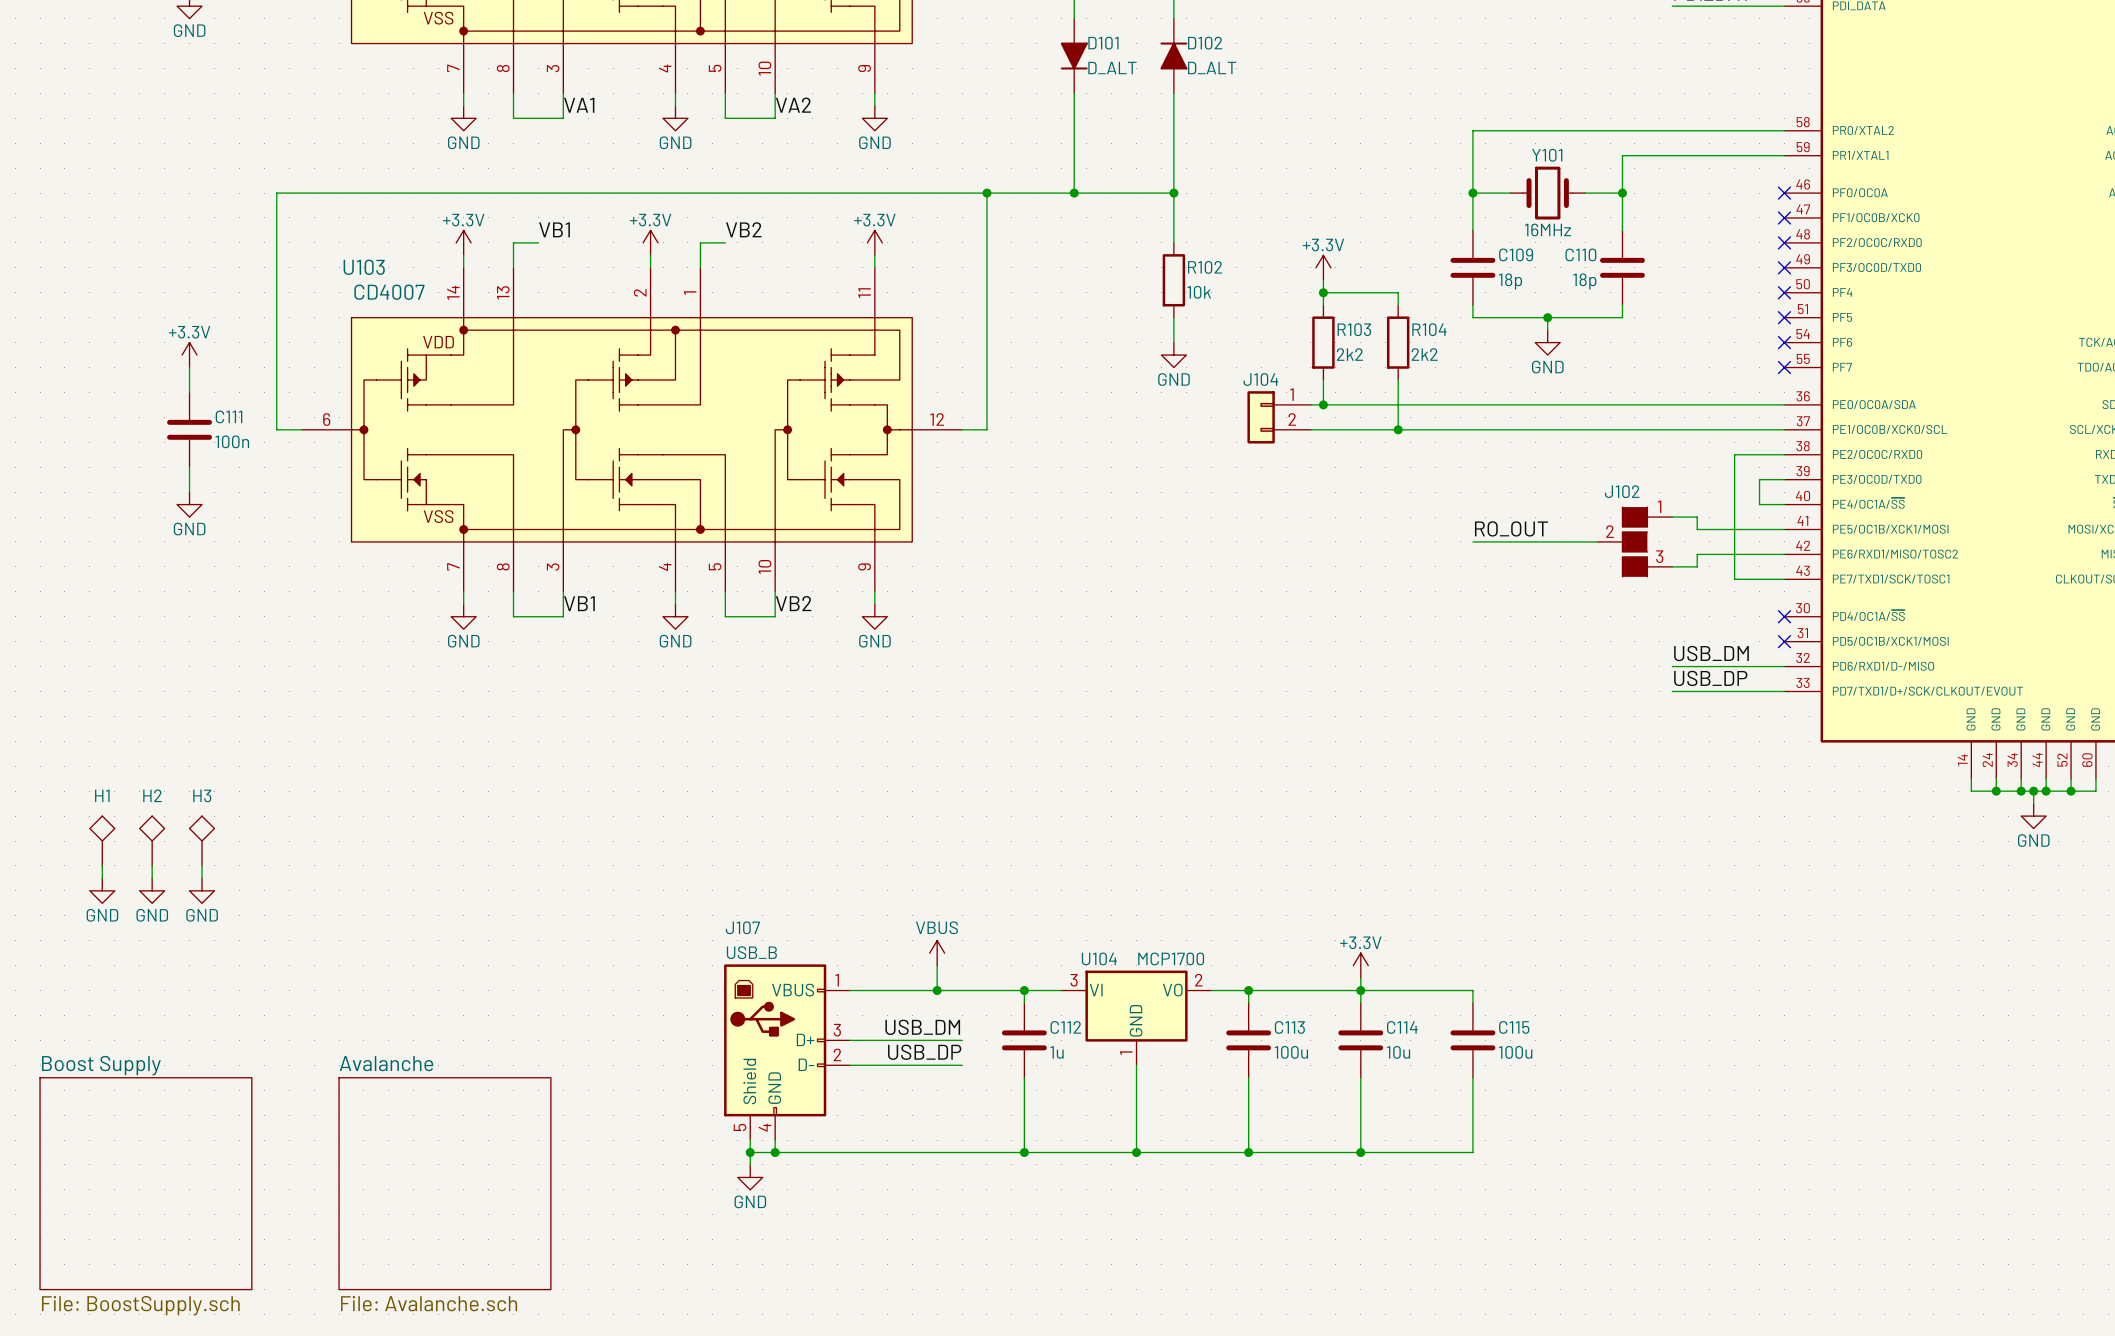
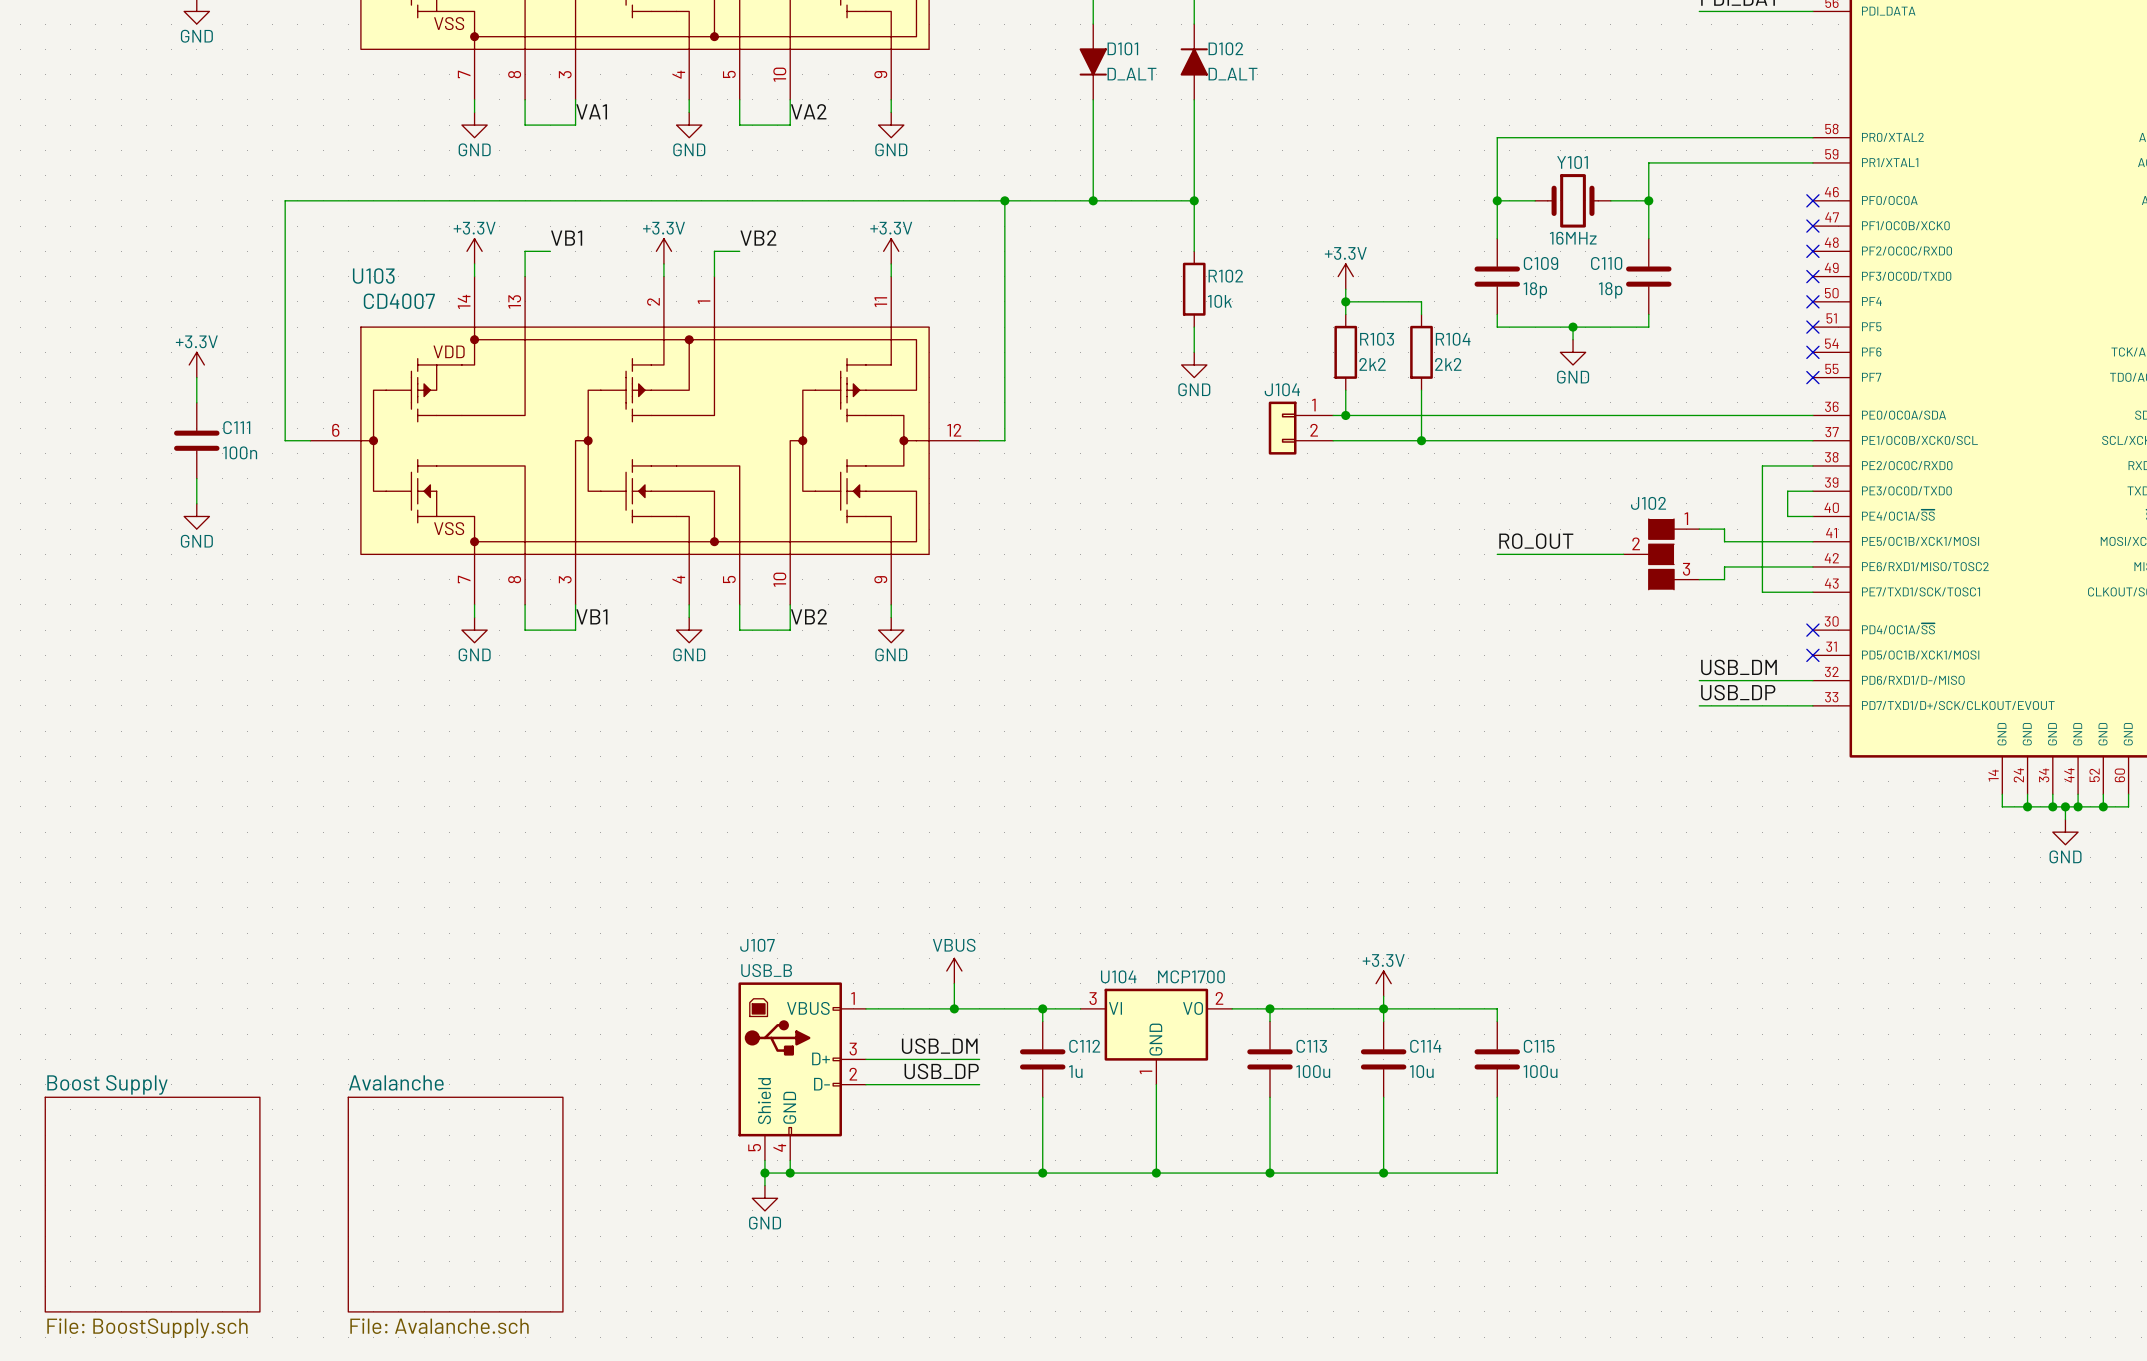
H1: (102, 841) -> none
H2: (152, 841) -> none
H3: (202, 841) -> none
wire: (102, 865) (102, 878) -> none
wire: (152, 865) (152, 878) -> none
wire: (202, 865) (202, 878) -> none
power symbol: GND (102, 890) -> none
power symbol: GND (152, 890) -> none
power symbol: GND (202, 890) -> none

